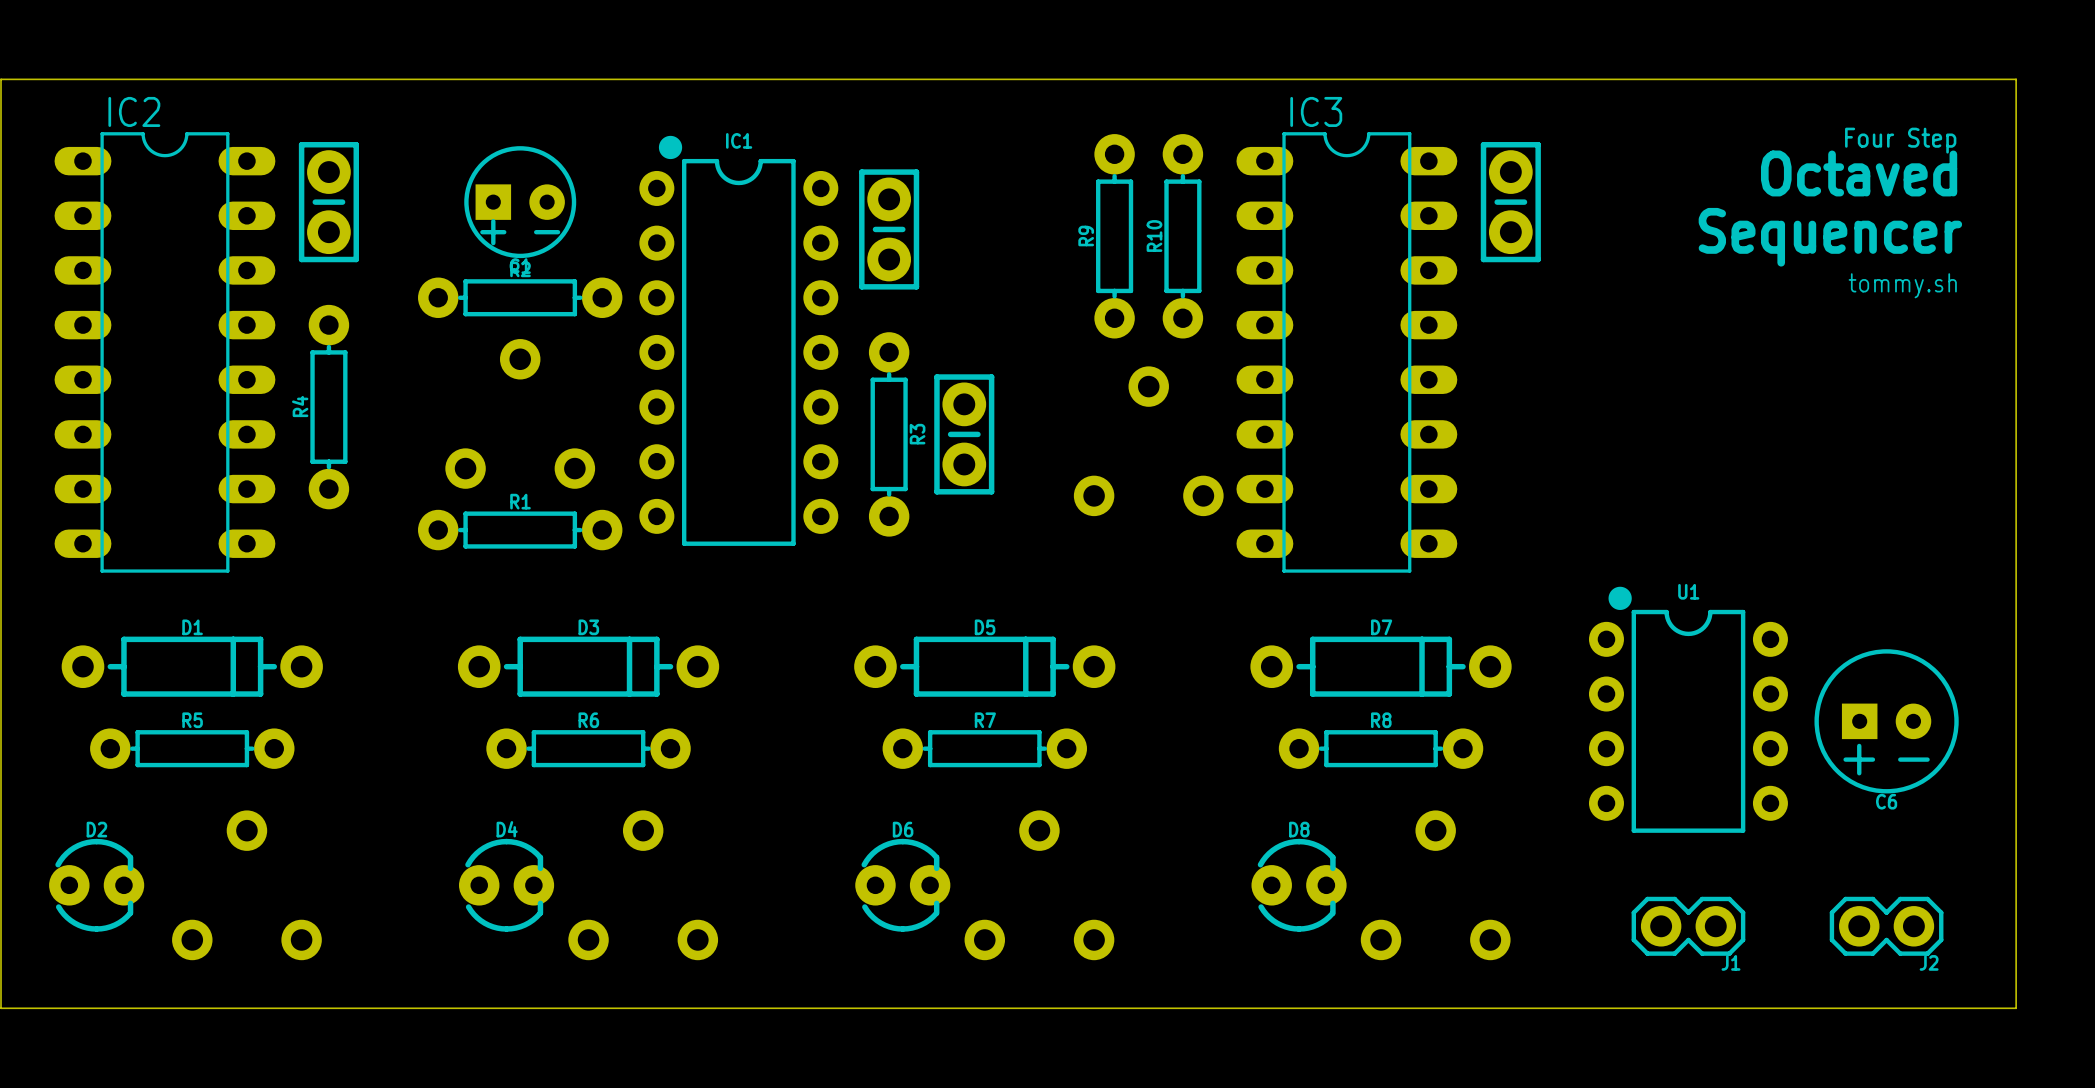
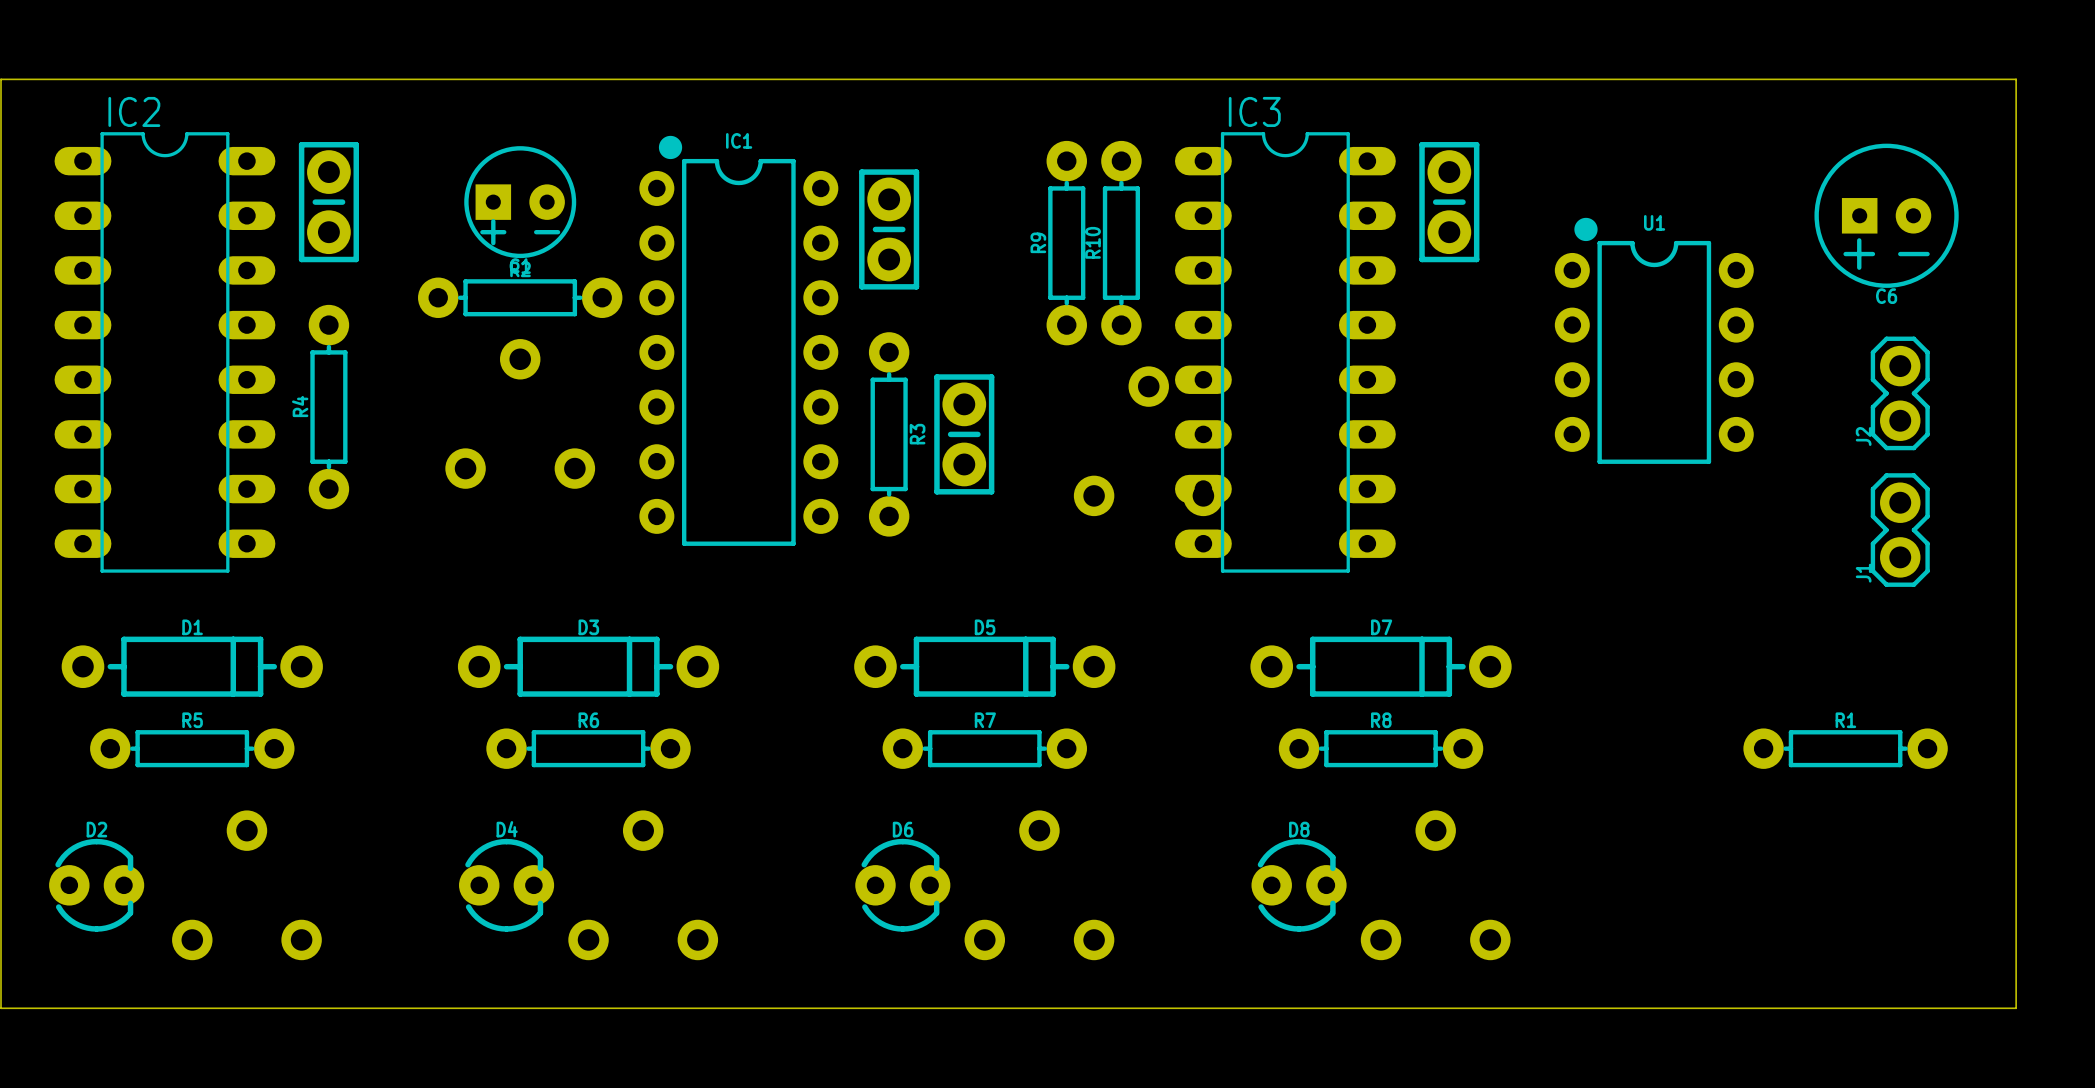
text: Four Step (1900, 140) -> none
text: Octaved (1859, 173) -> none
part position: (1510, 202) -> (1449, 202)
R9 position: (1114, 236) -> (1066, 243)
R10 position: (1182, 236) -> (1121, 243)
text: Sequencer (1830, 237) -> none
text: tommy.sh (1902, 285) -> none
IC3 position: (1346, 352) -> (1285, 352)
R1 position: (520, 530) -> (1845, 748)
U1 position: (1688, 709) -> (1654, 340)
C6 position: (1886, 721) -> (1886, 215)
J1 rotation: 0° (1688, 926) -> 90° clockwise (1900, 530)
J1 position: (1688, 926) -> (1900, 530)
J2 rotation: 0° (1886, 926) -> 90° clockwise (1900, 393)
J2 position: (1886, 926) -> (1900, 393)

